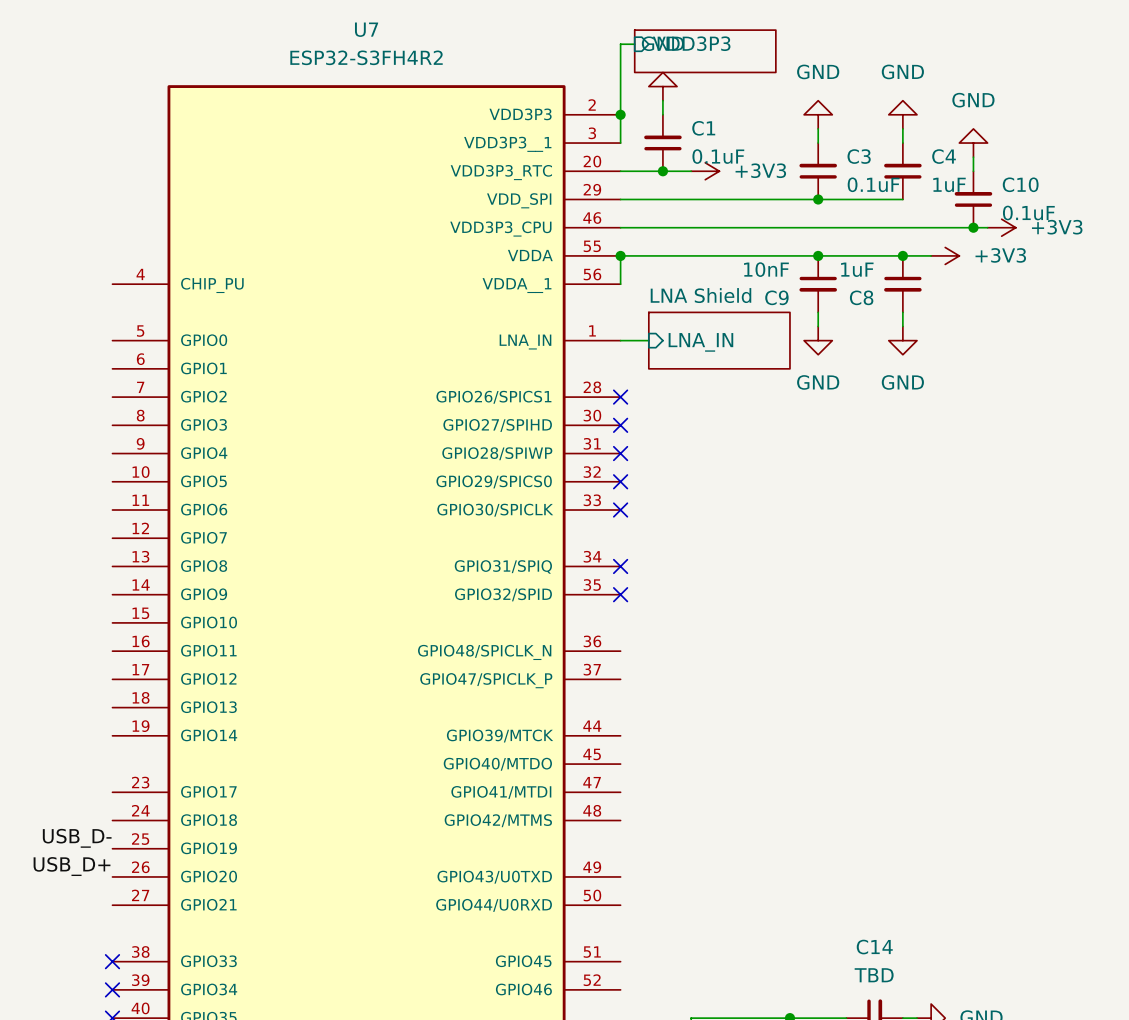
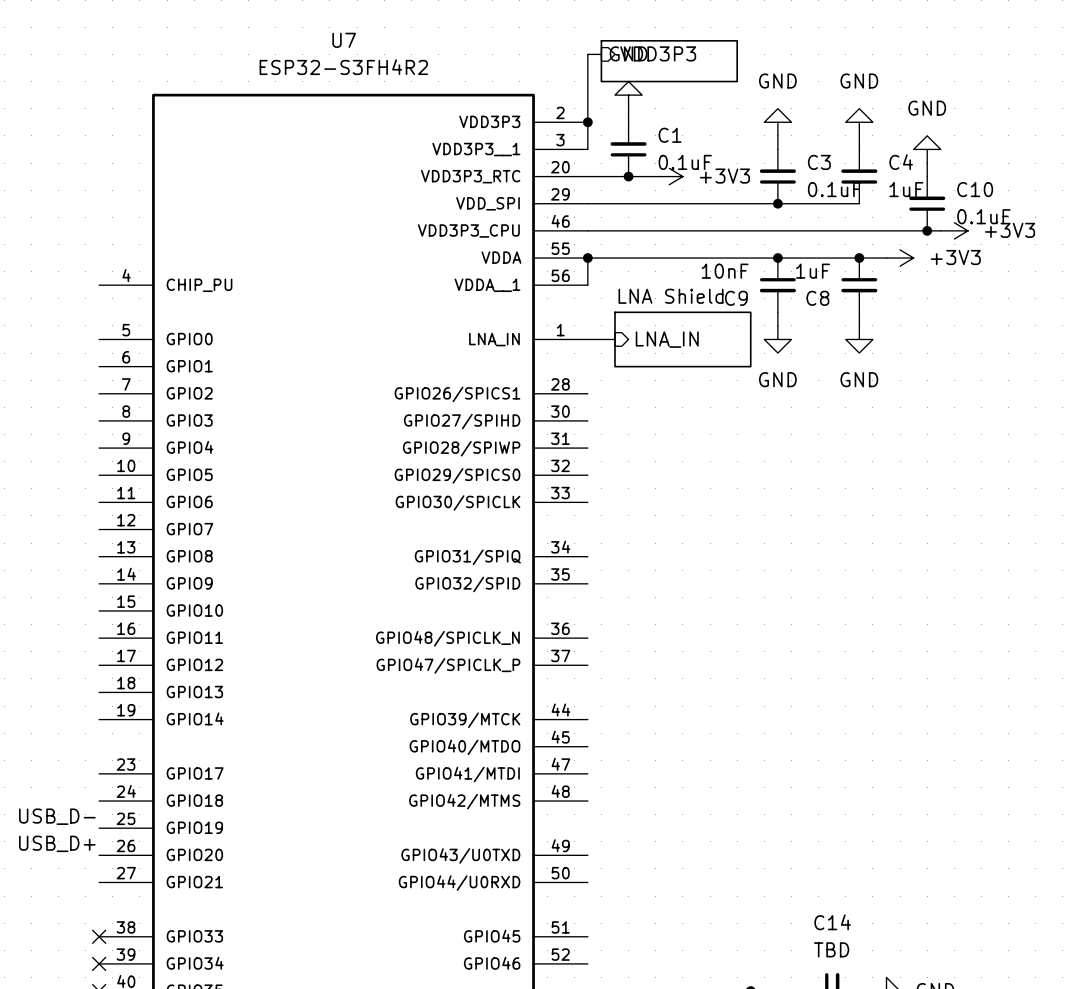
no-connect mark: (620, 397) -> none
no-connect mark: (620, 425) -> none
no-connect mark: (620, 453) -> none
no-connect mark: (620, 481) -> none
no-connect mark: (620, 510) -> none
no-connect mark: (620, 566) -> none
no-connect mark: (620, 594) -> none

